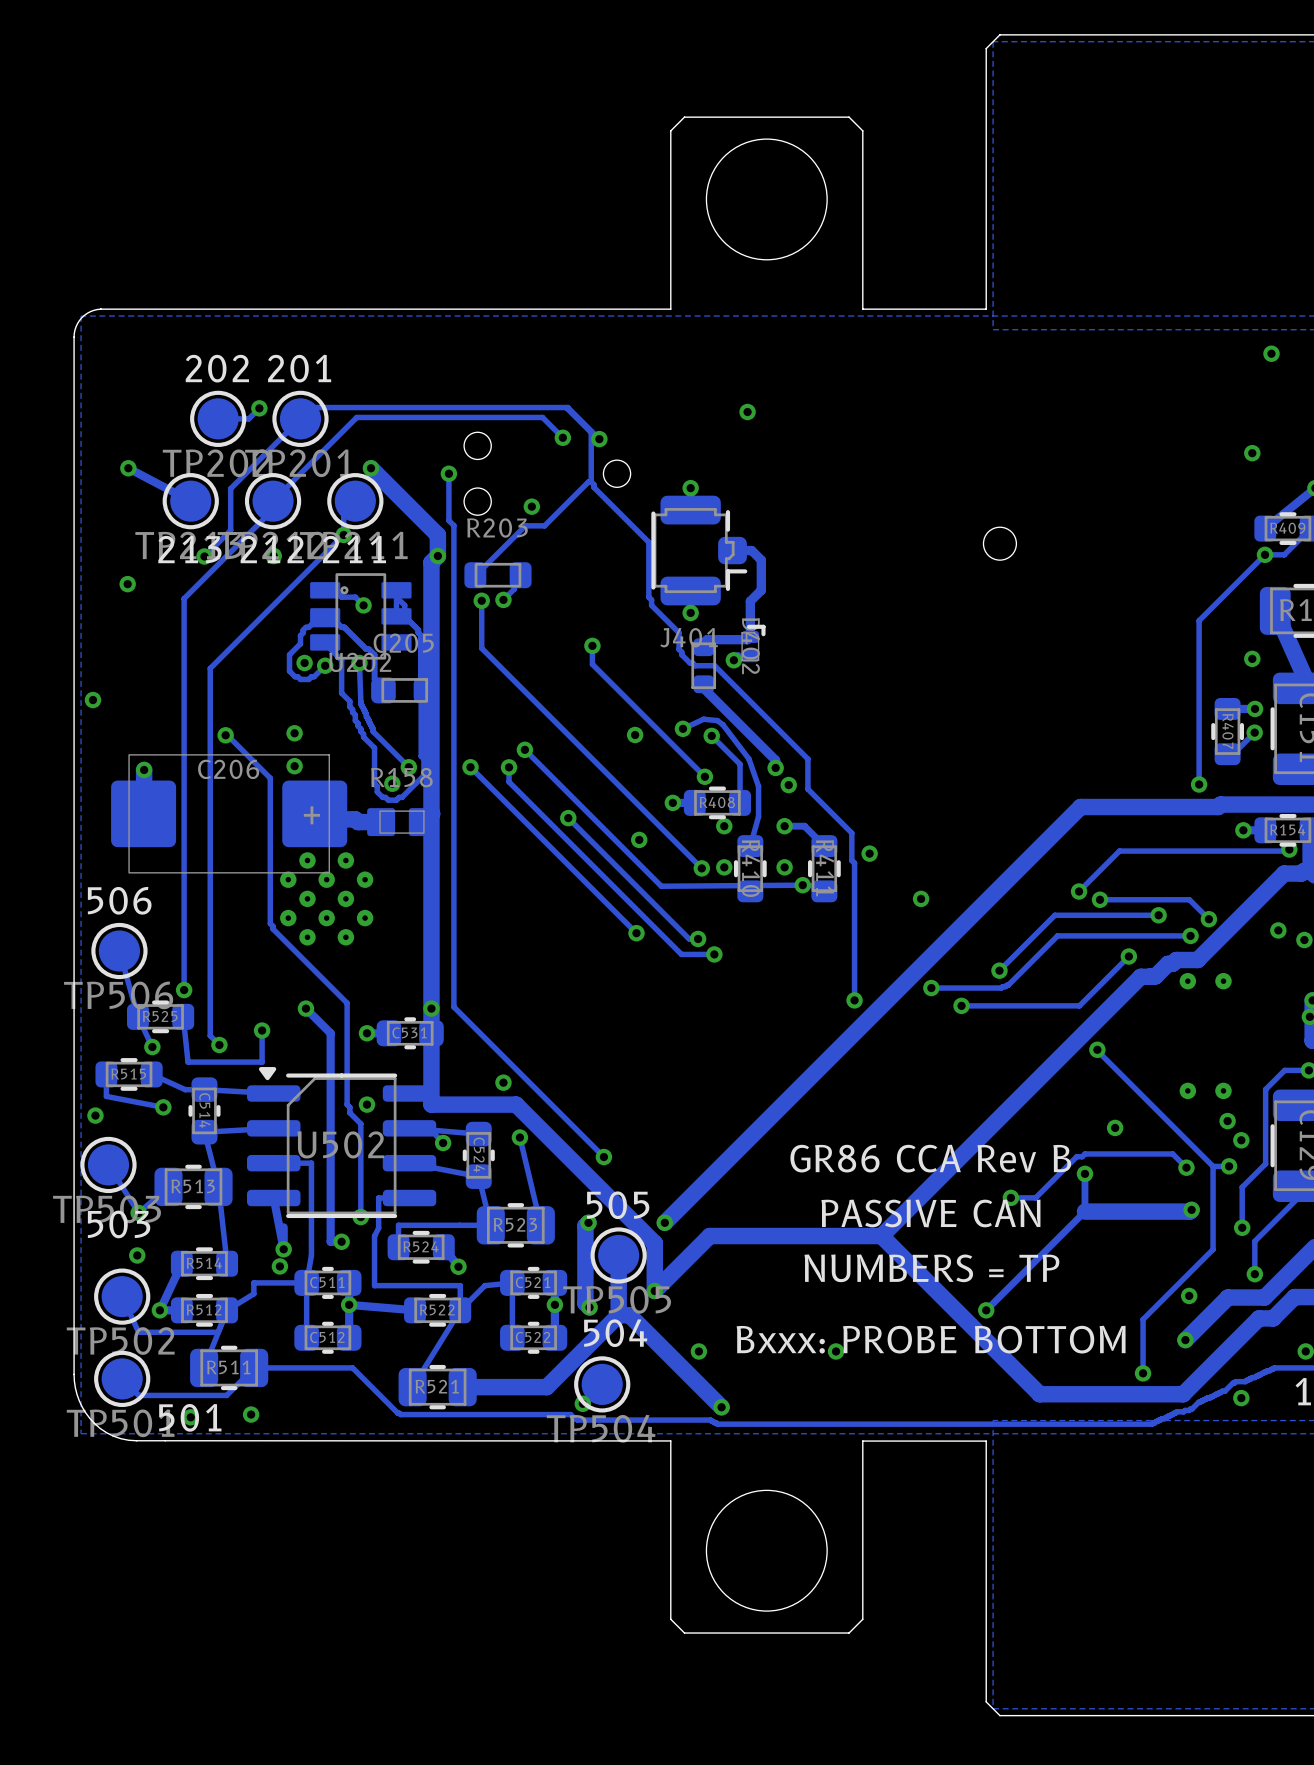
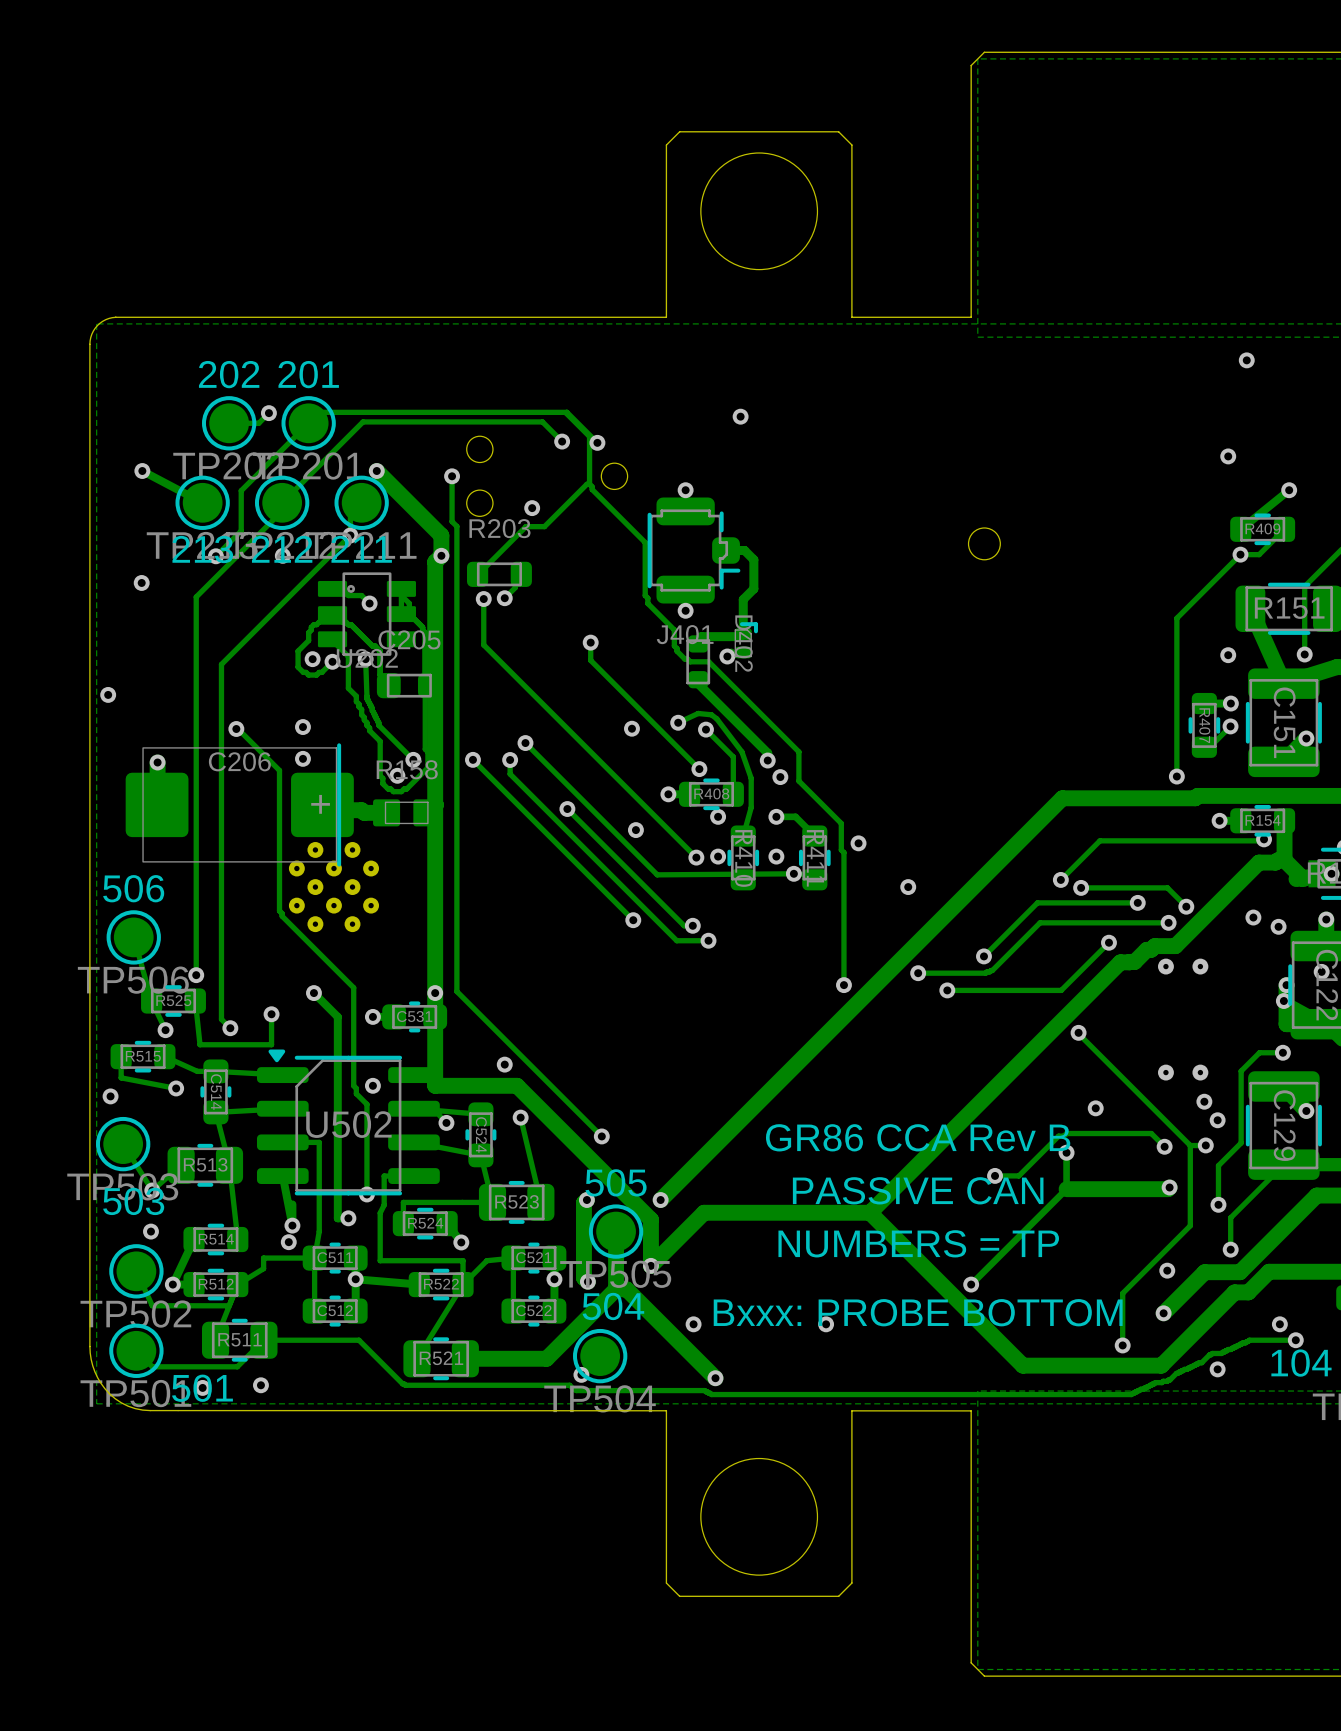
C206 footprint: [111, 754, 348, 874] -> [125, 743, 354, 867]

